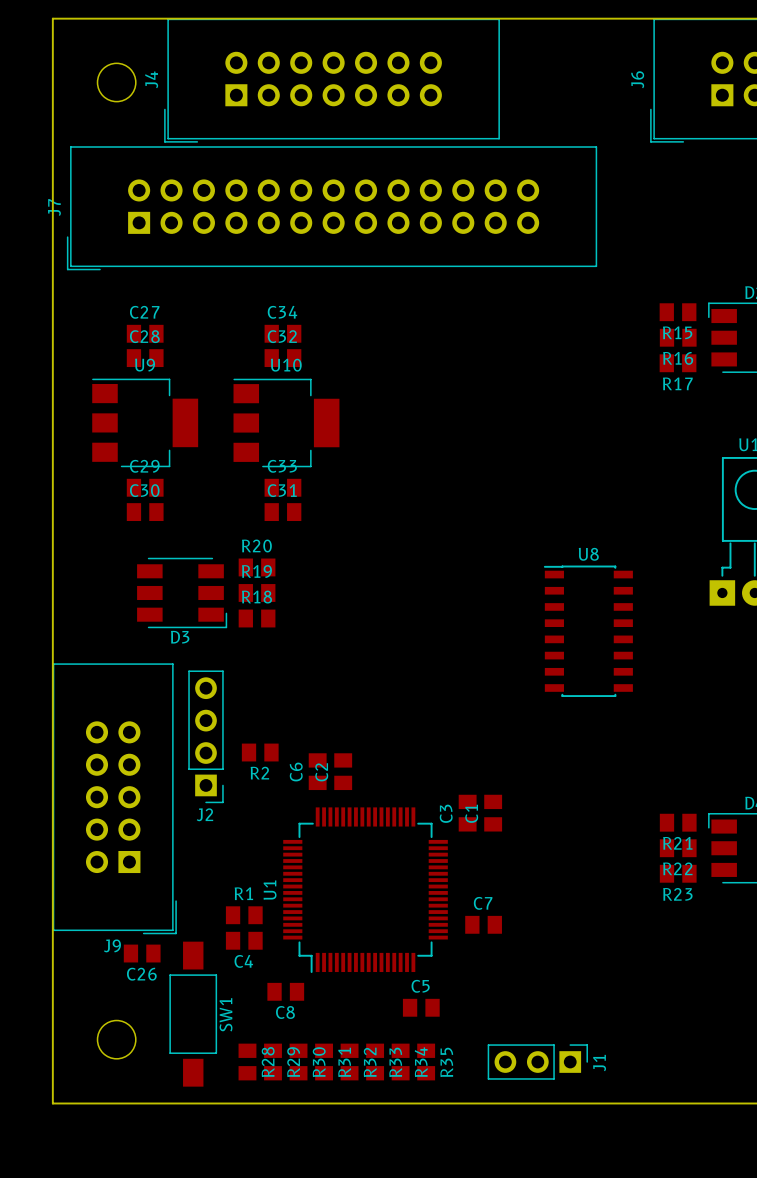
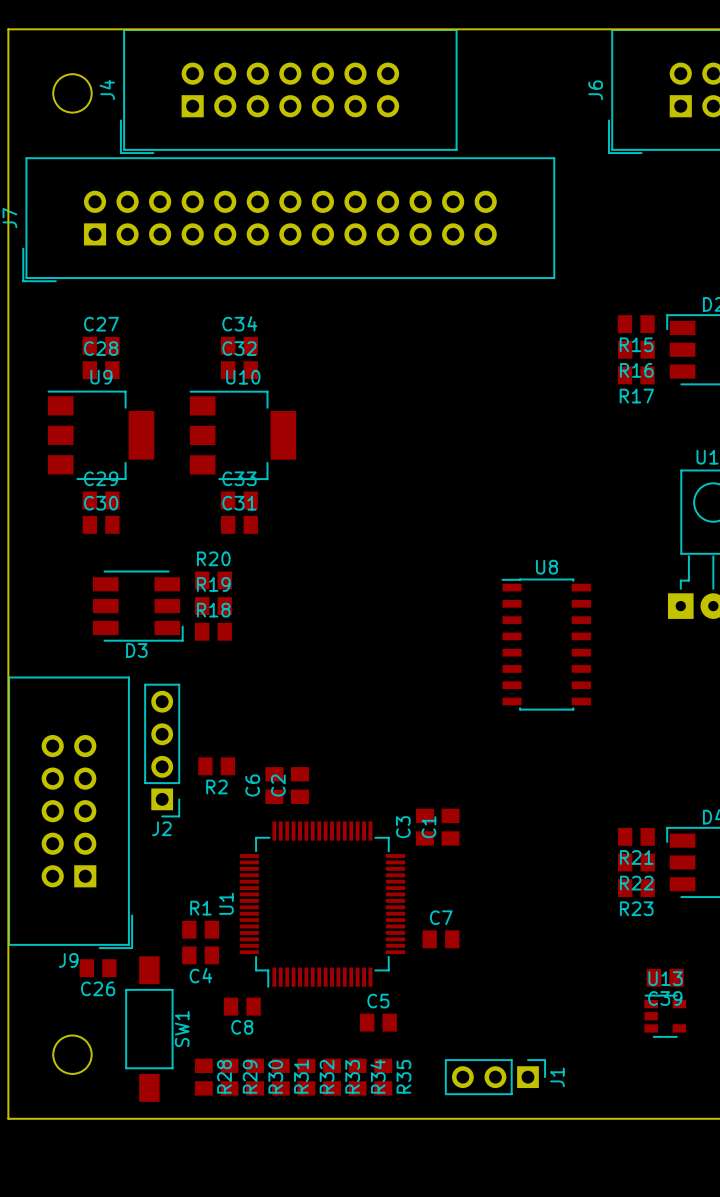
C39: none -> (665, 977)
U13: none -> (665, 1016)

